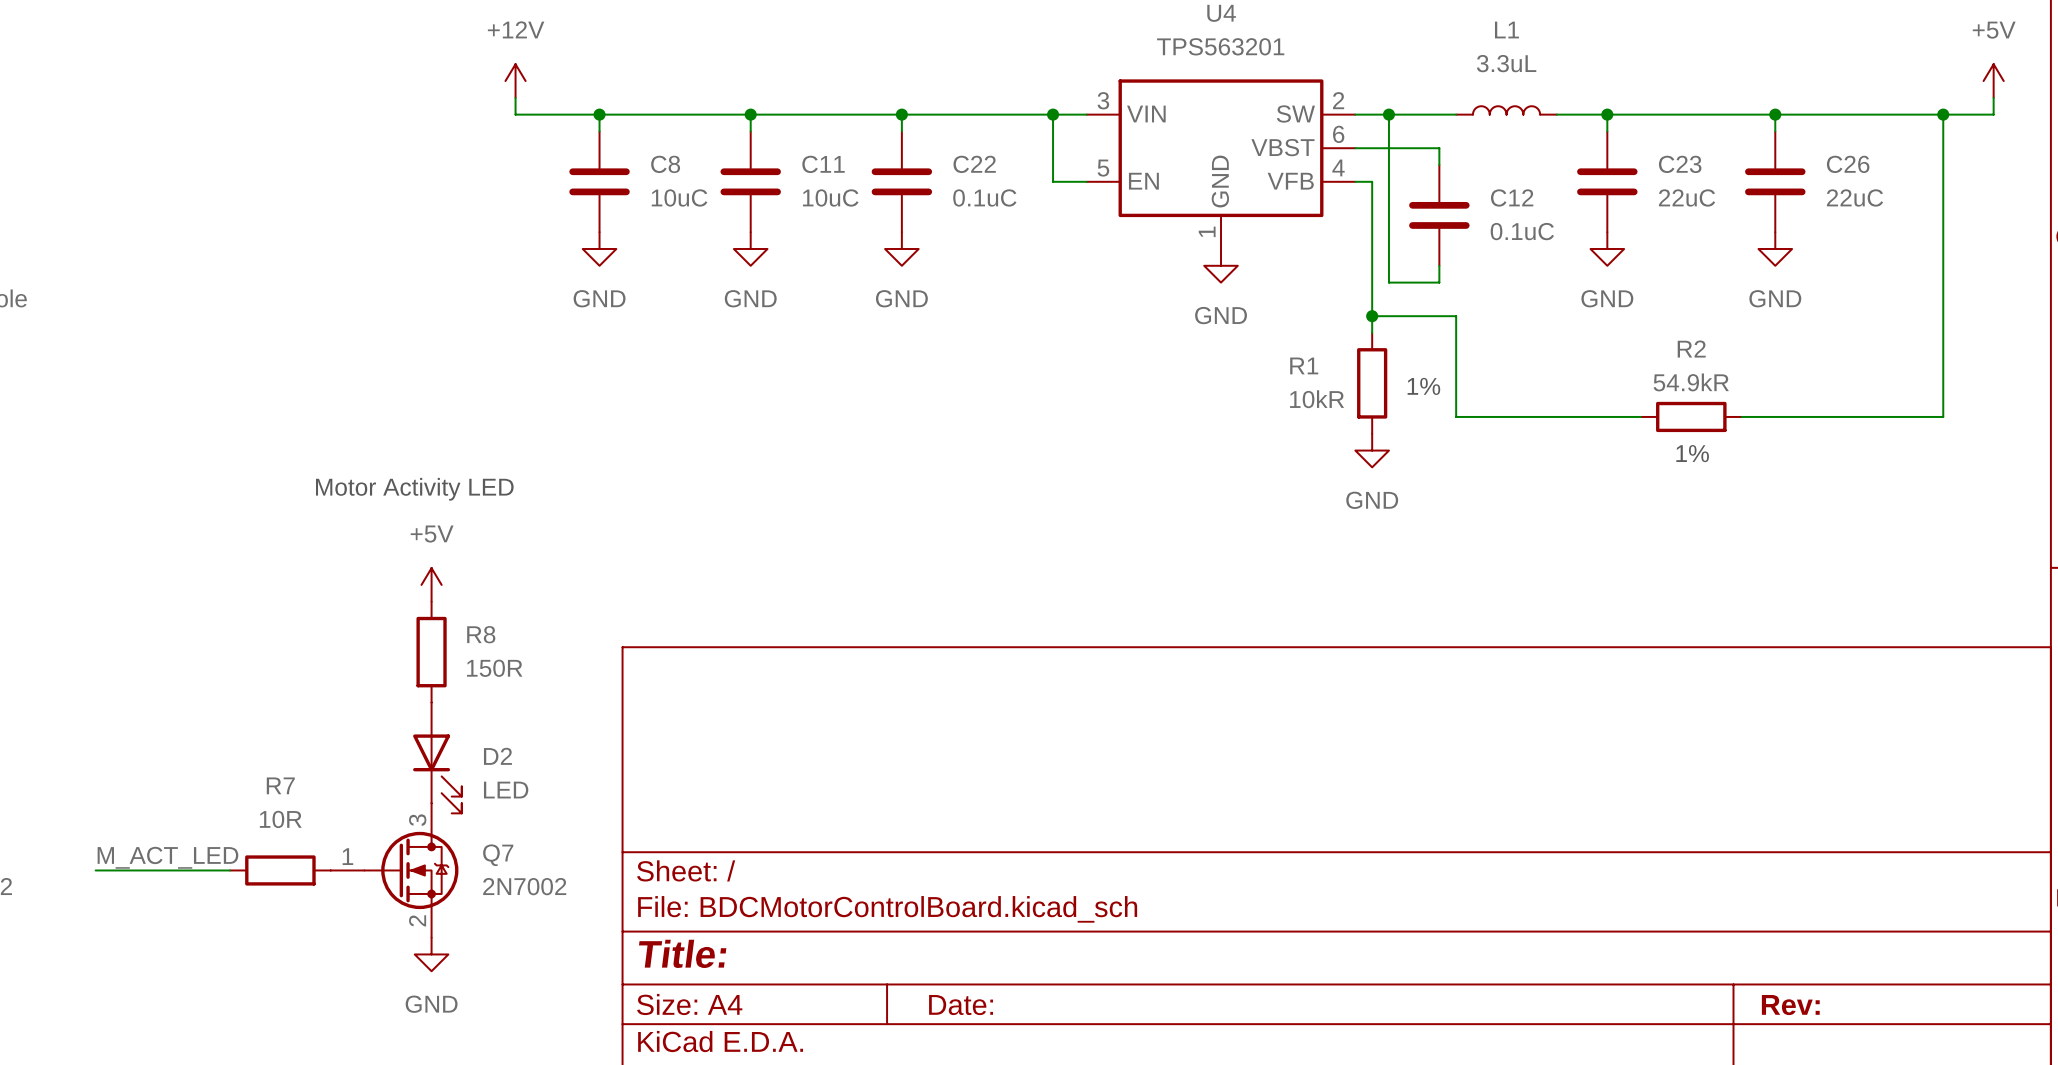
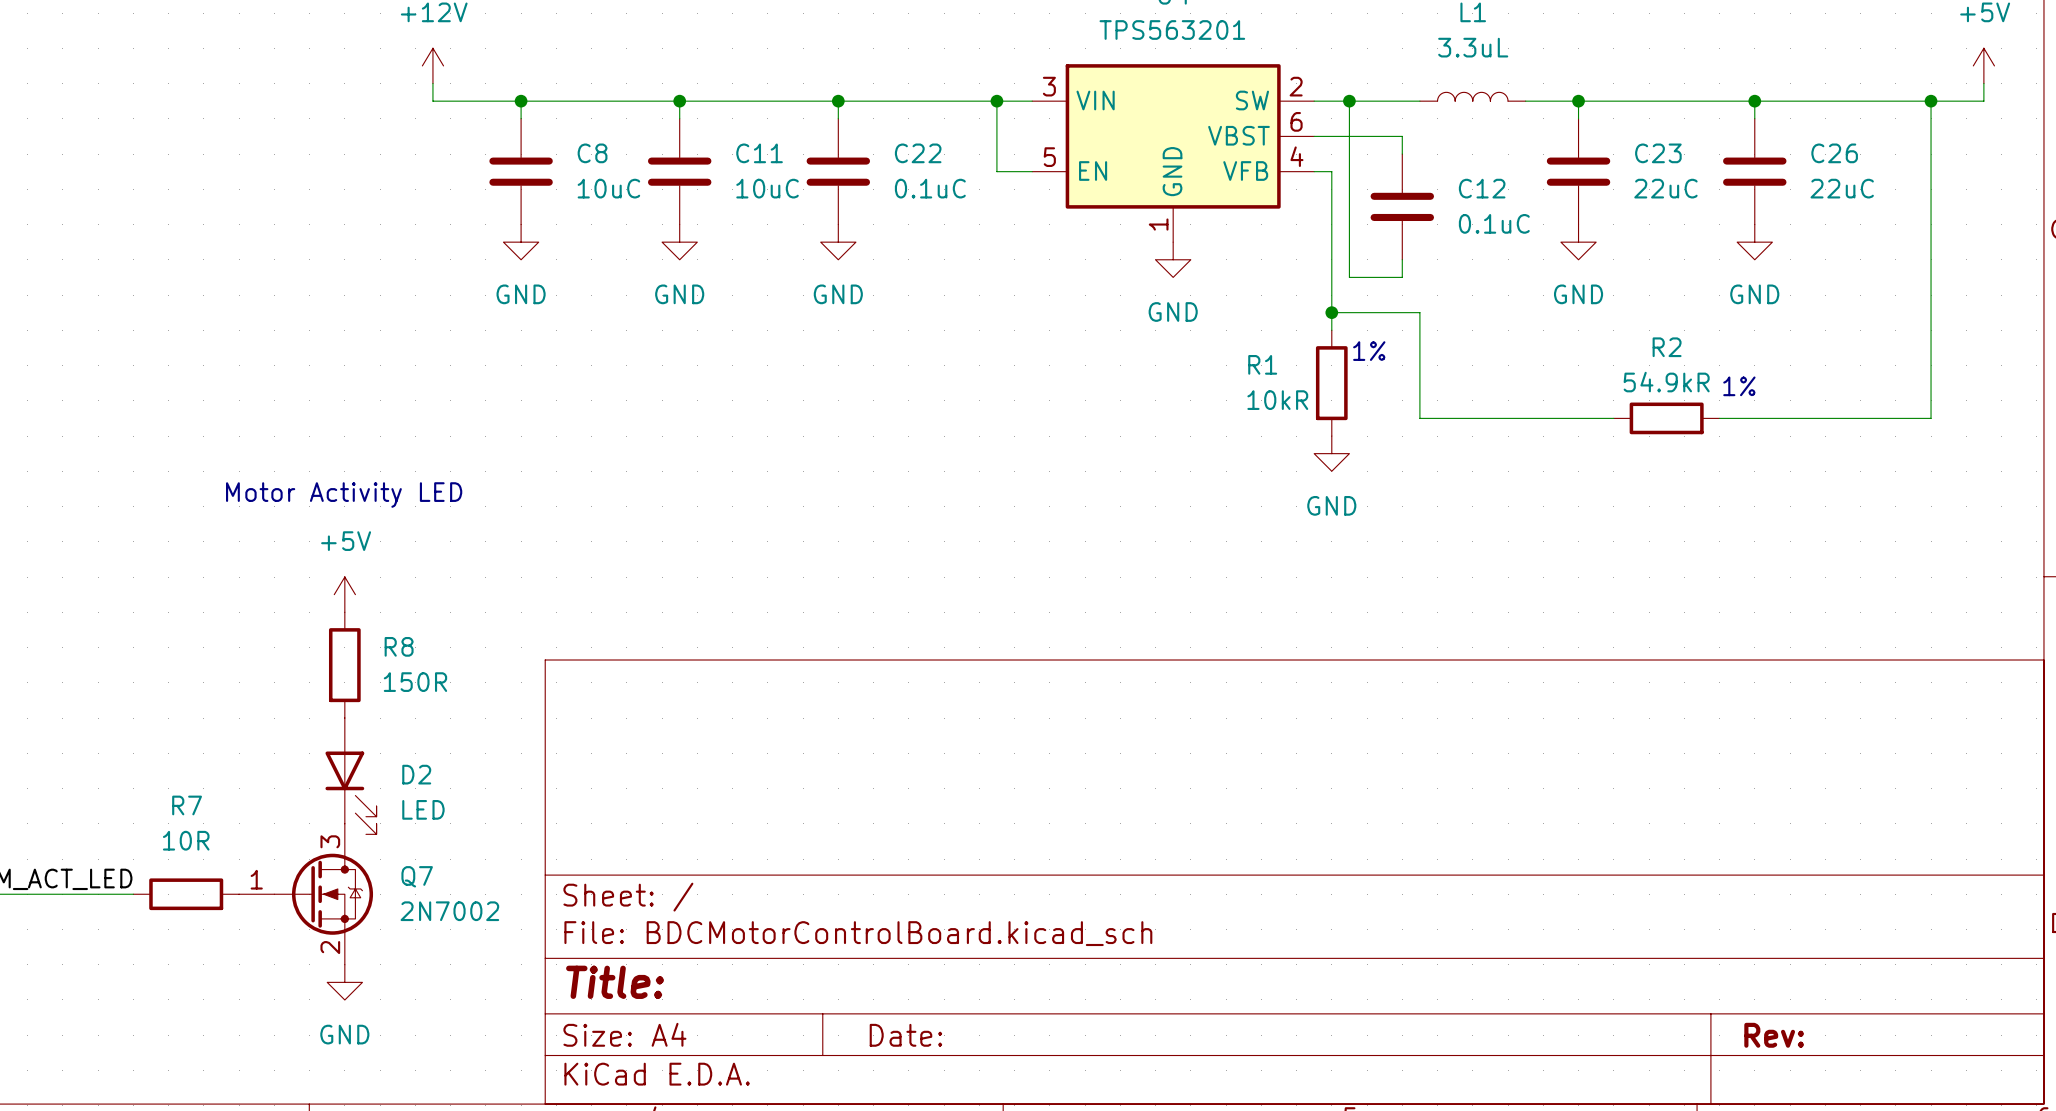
text position: 1% (1423, 386) -> 1% (1369, 351)
text position: 1% (1692, 453) -> 1% (1739, 386)

